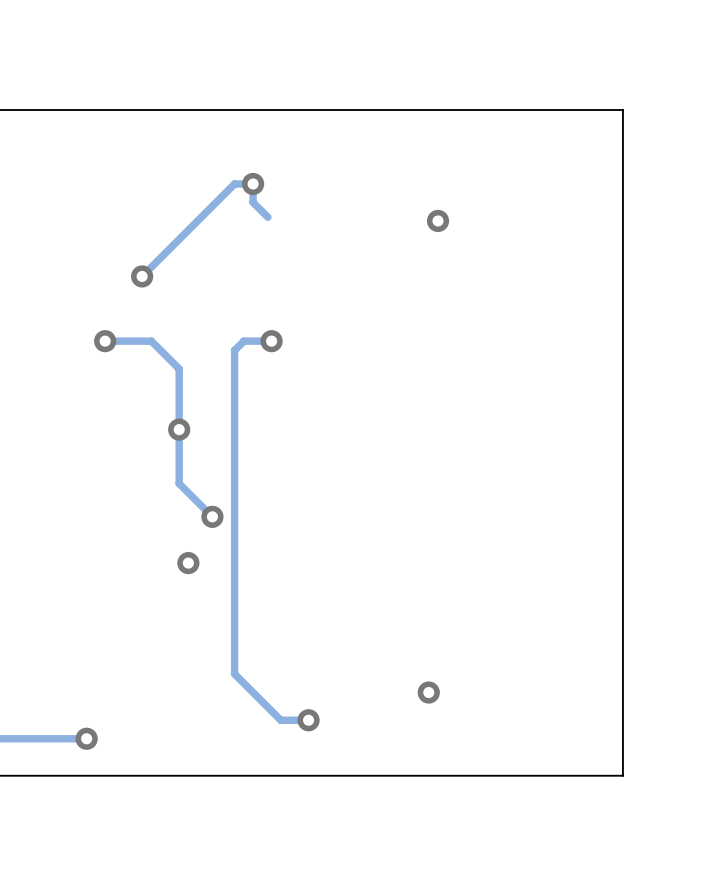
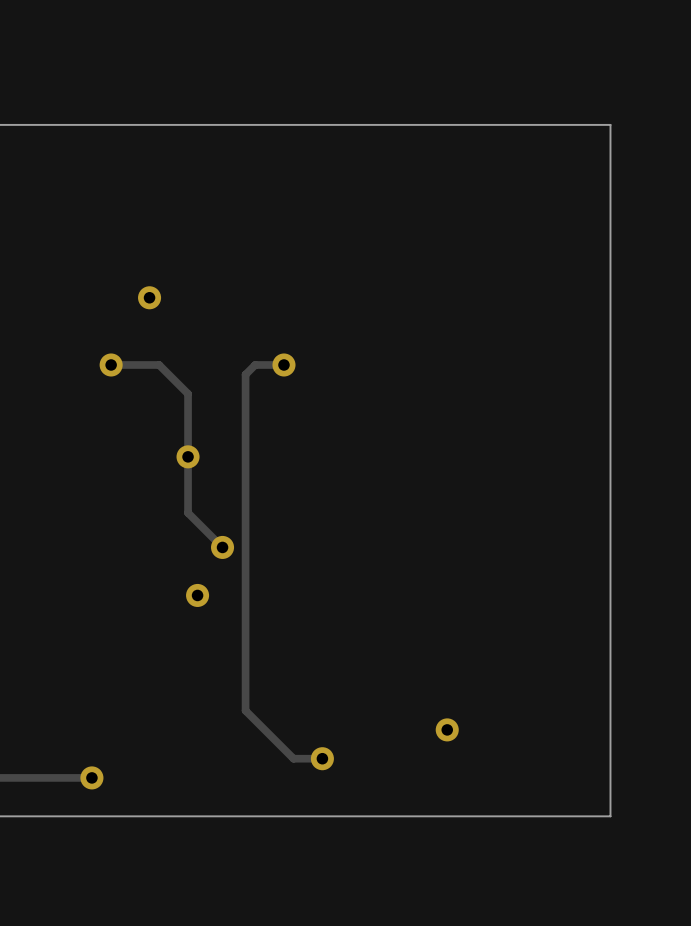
board edge: (585, 110) (622, 110) (622, 775) (585, 775) -> (610, 124) (610, 816)
via: (253, 183) -> none
track: (267, 217) (253, 202) (253, 183) (234, 183) (142, 276) -> none
via: (438, 220) -> none

